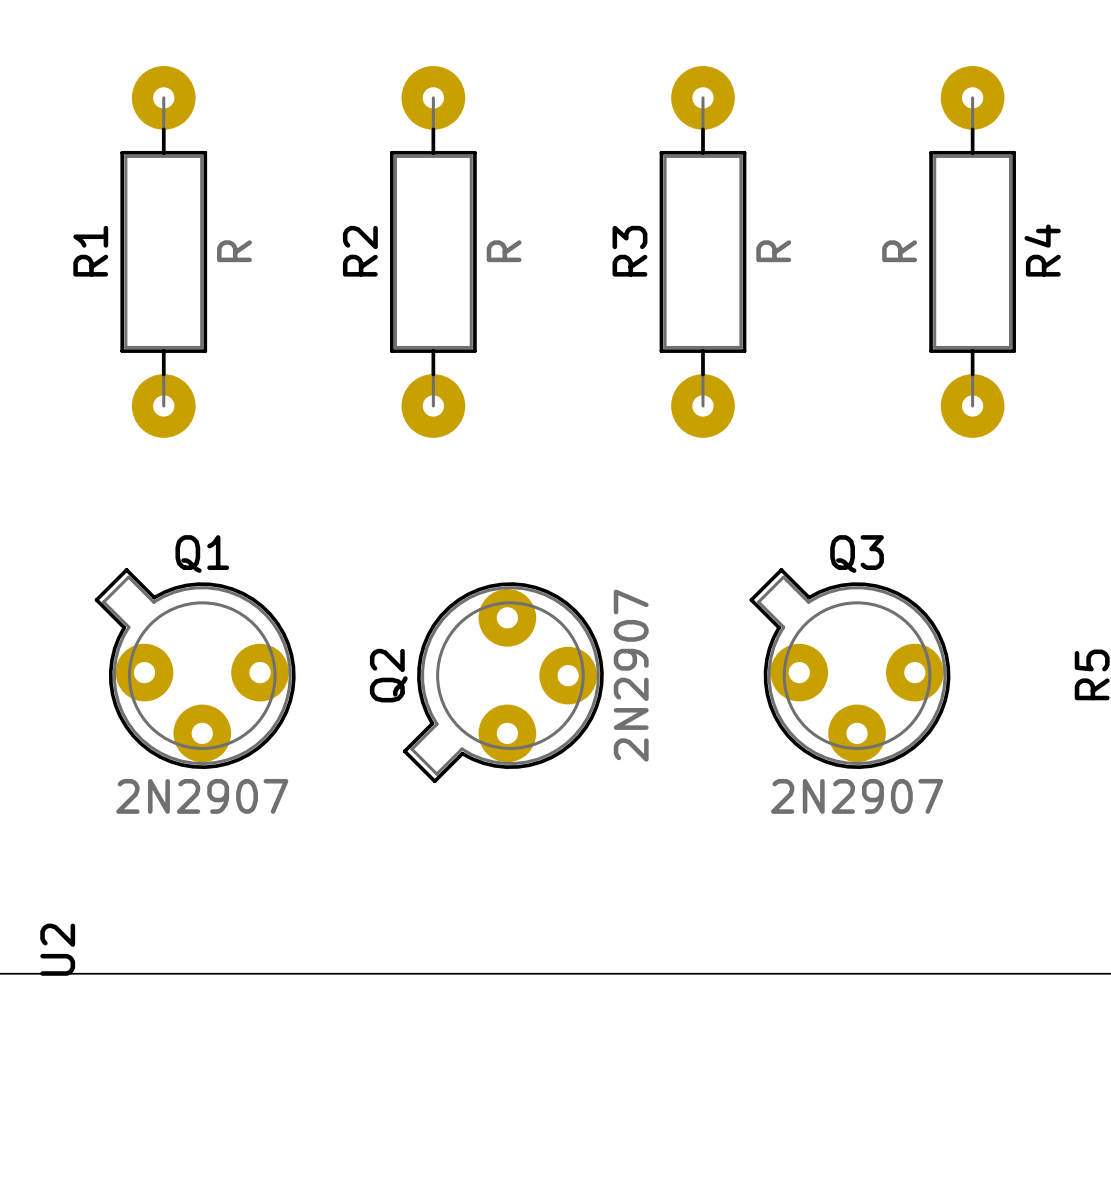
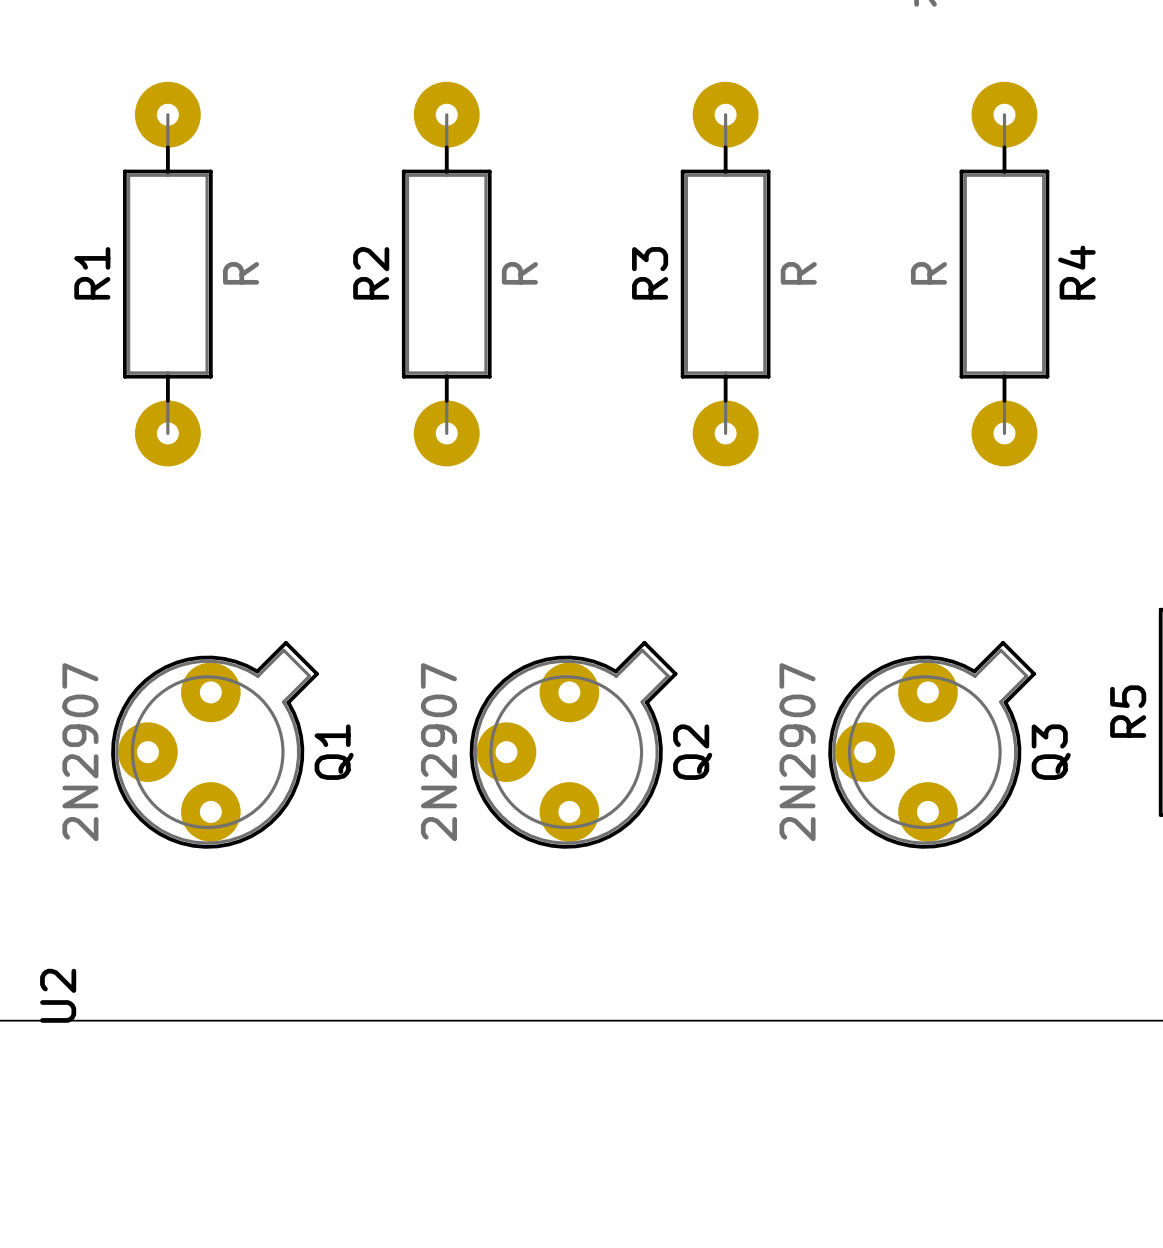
Q1 rotation: 0° (195, 668) -> 90° clockwise (215, 744)
Q3 rotation: 0° (850, 668) -> 90° clockwise (932, 744)
Q2 rotation: 0° (503, 682) -> 180° (573, 744)

